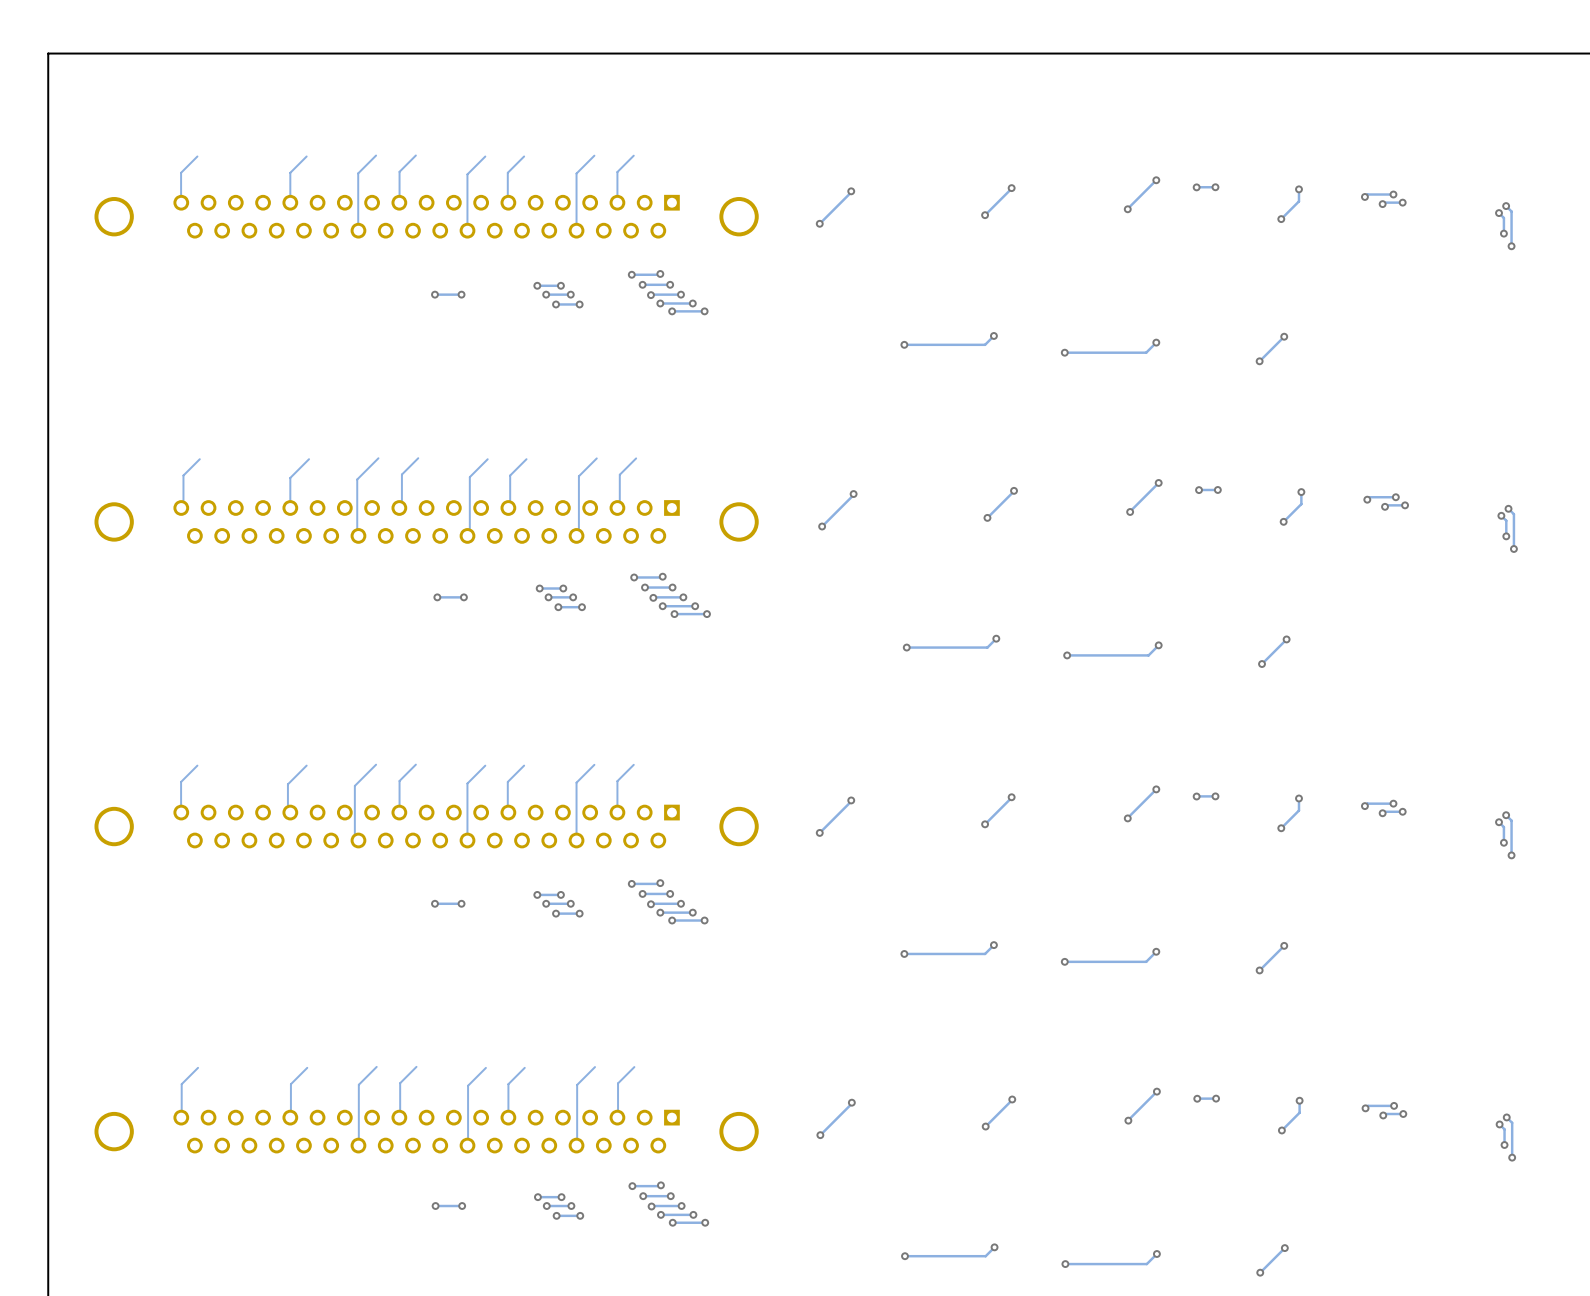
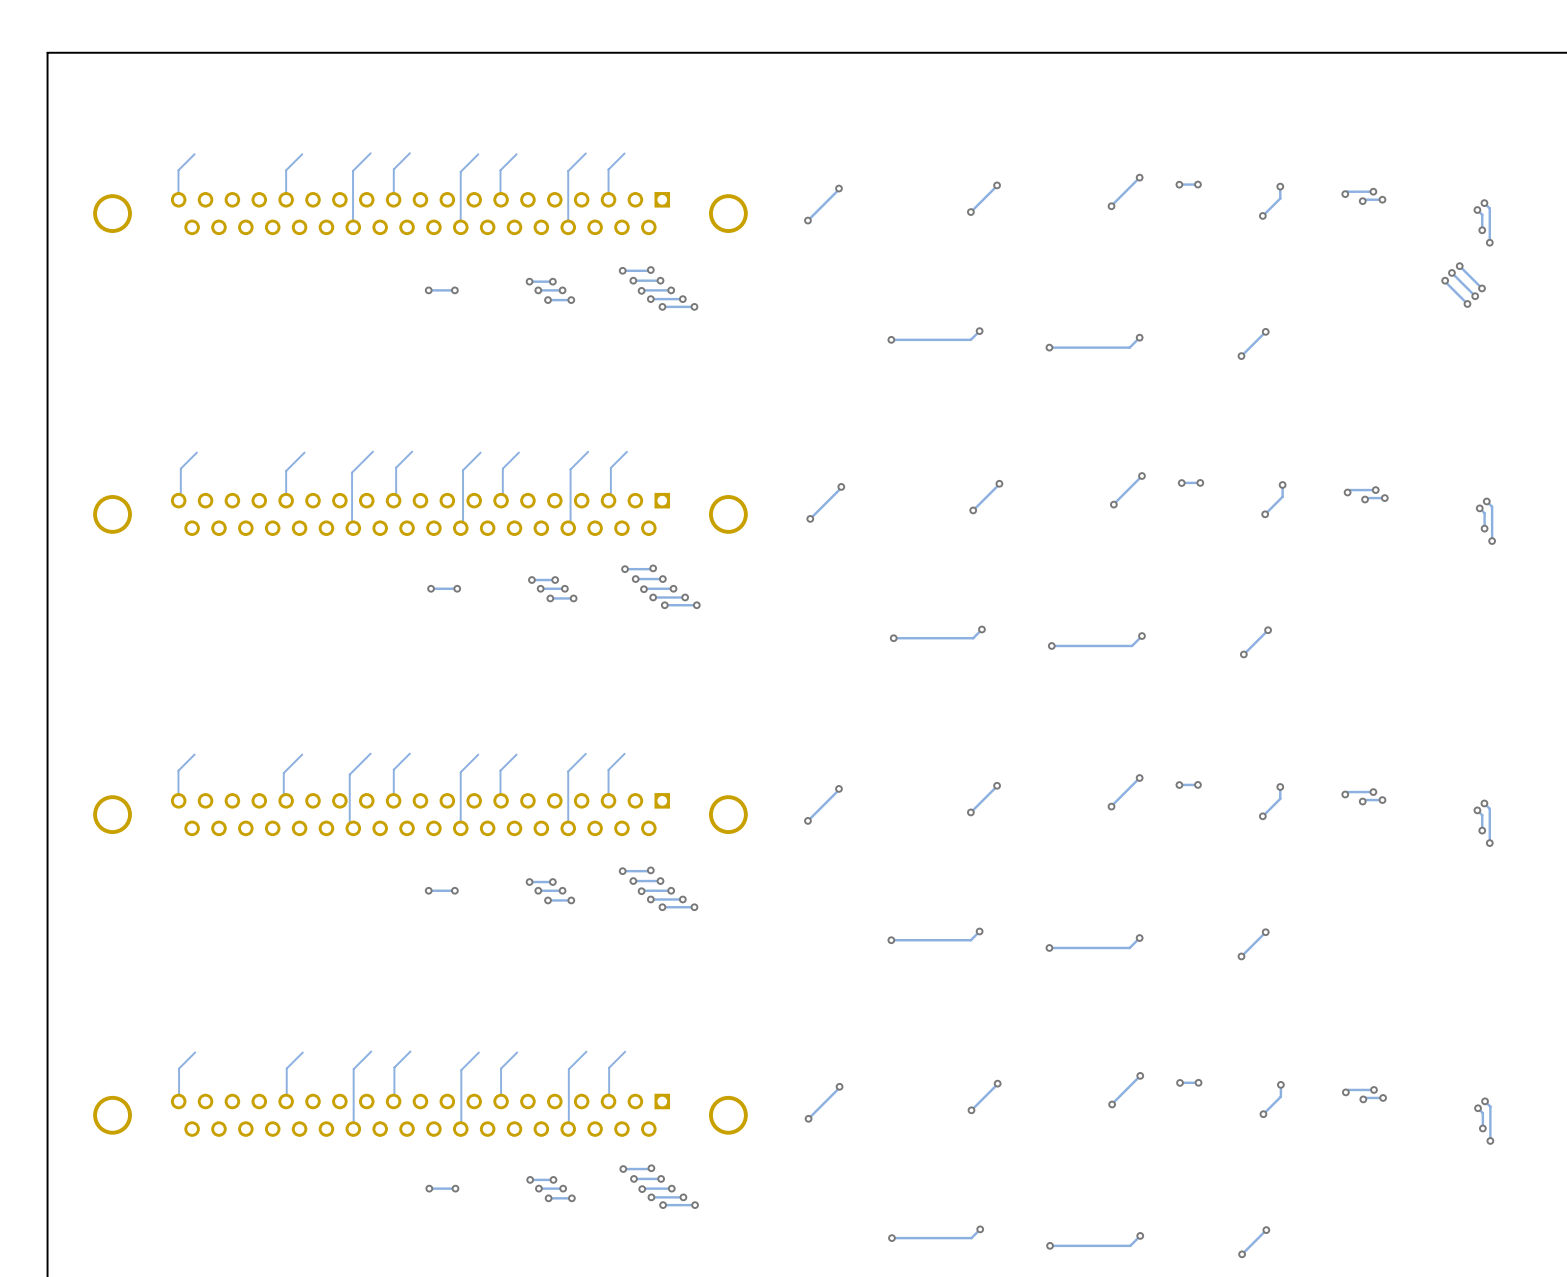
track: none -> (1459, 266) (1482, 288)
via: none -> (1459, 266)
track: none -> (1451, 272) (1475, 296)
via: none -> (1451, 272)
track: none -> (1445, 280) (1467, 303)
via: none -> (1445, 280)
via: none -> (1482, 288)
via: none -> (1475, 296)
via: none -> (1467, 303)

